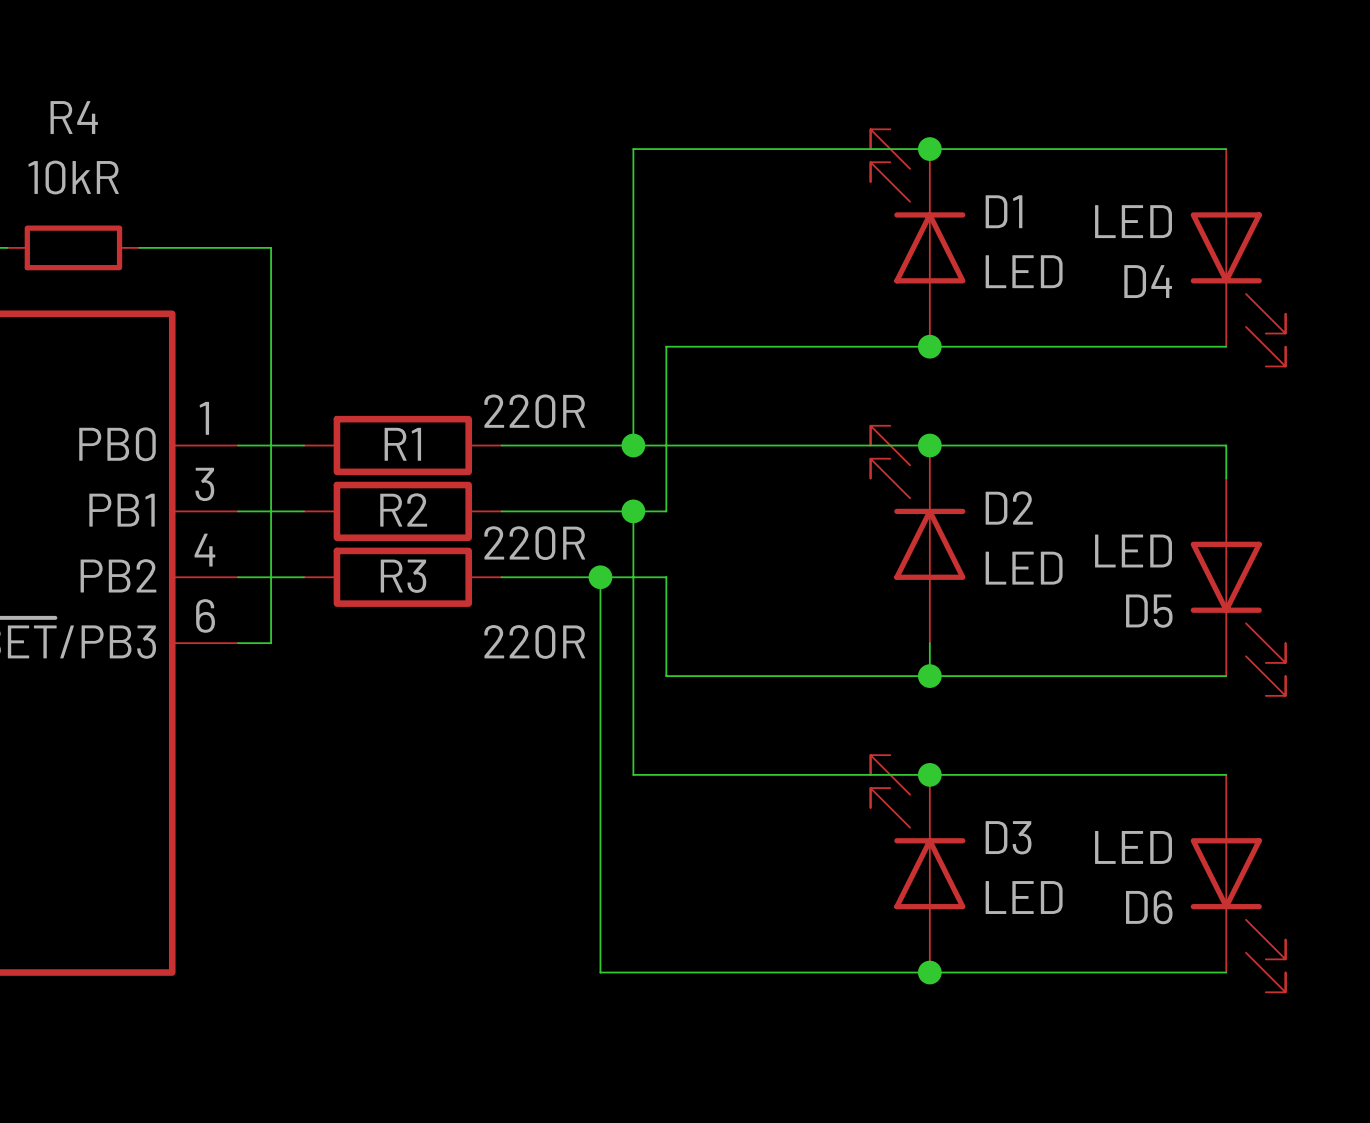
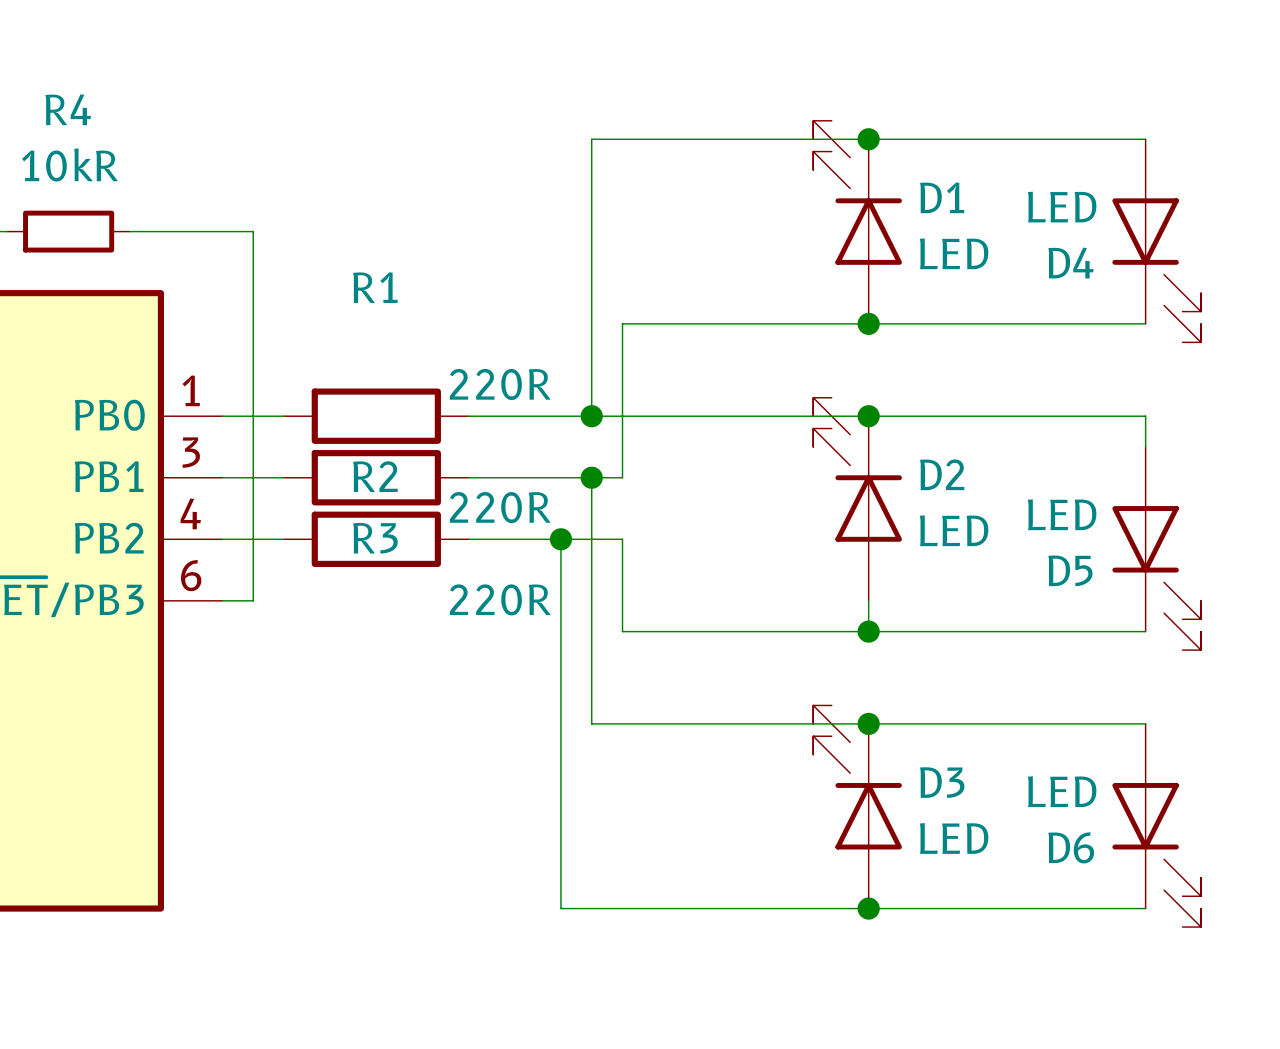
R1 name position: R1 (402, 444) -> R1 (375, 287)

